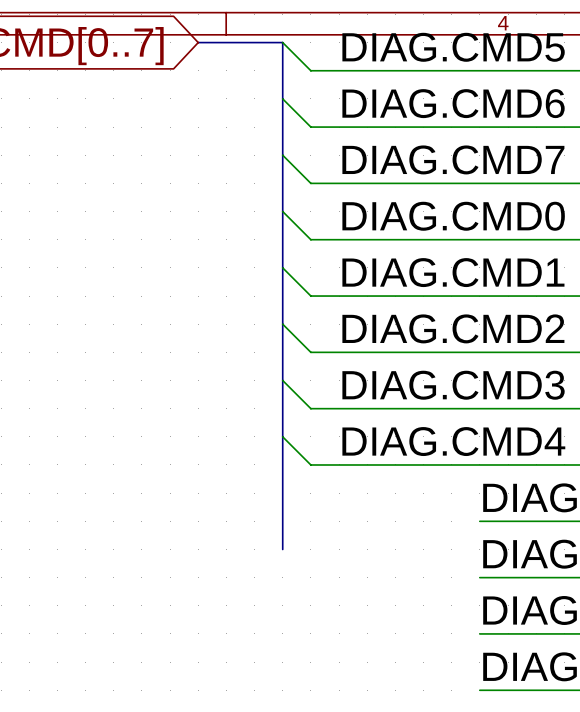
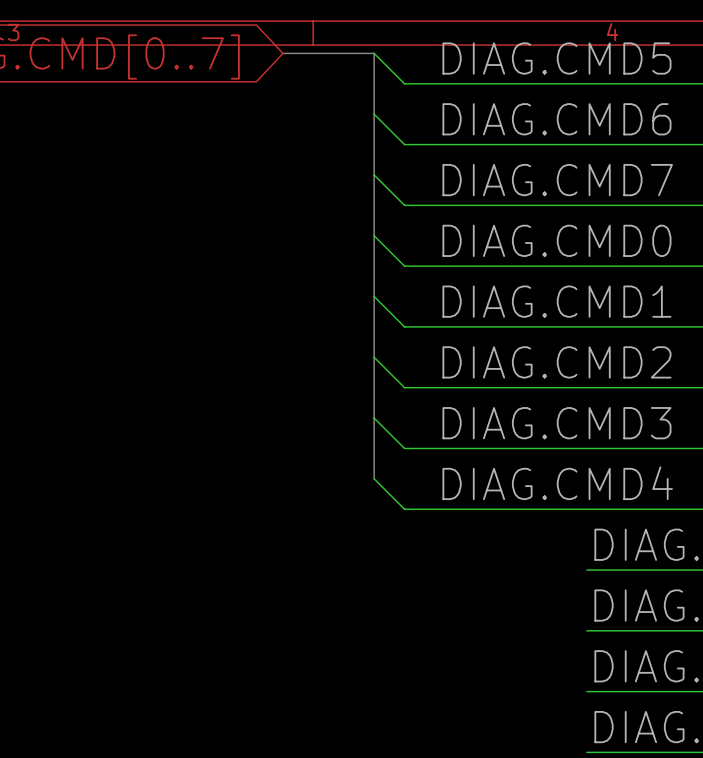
bus: (282, 436) (282, 549) -> none

